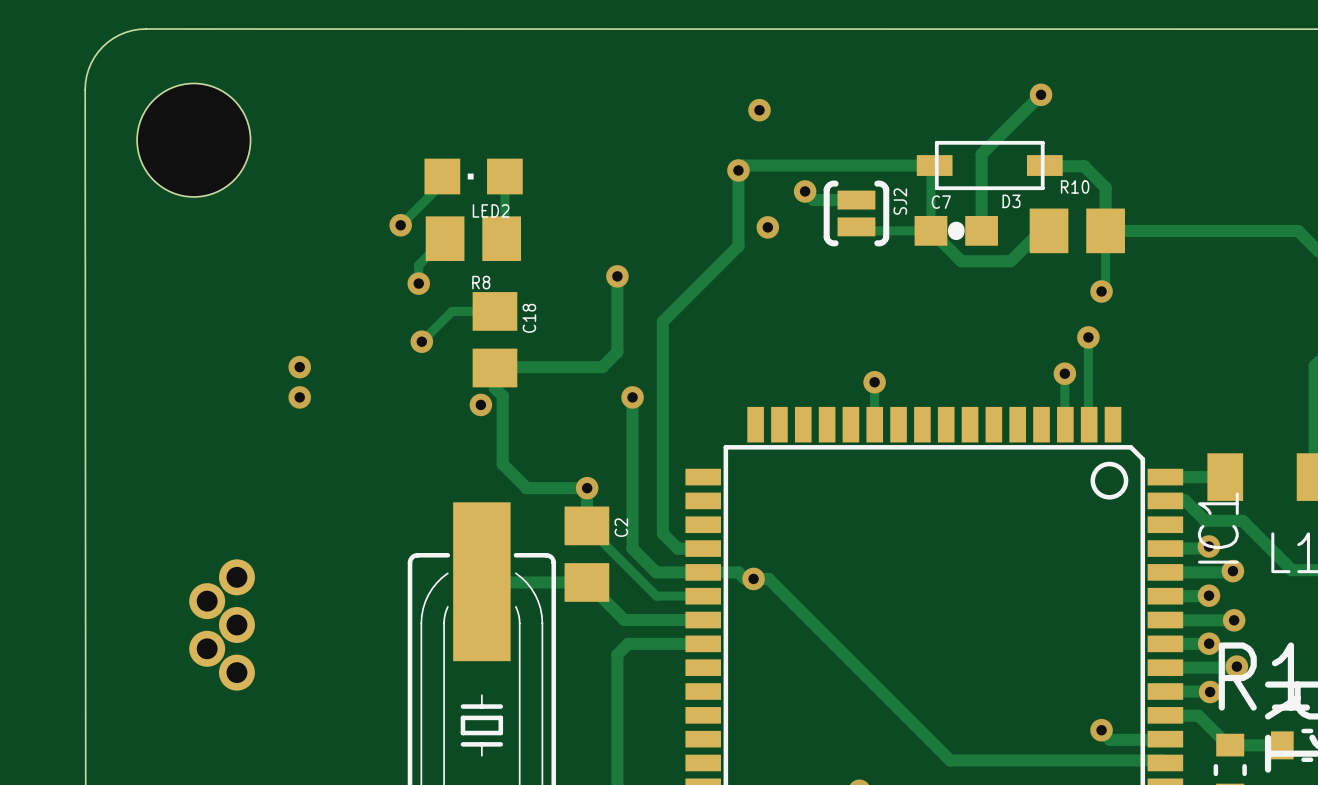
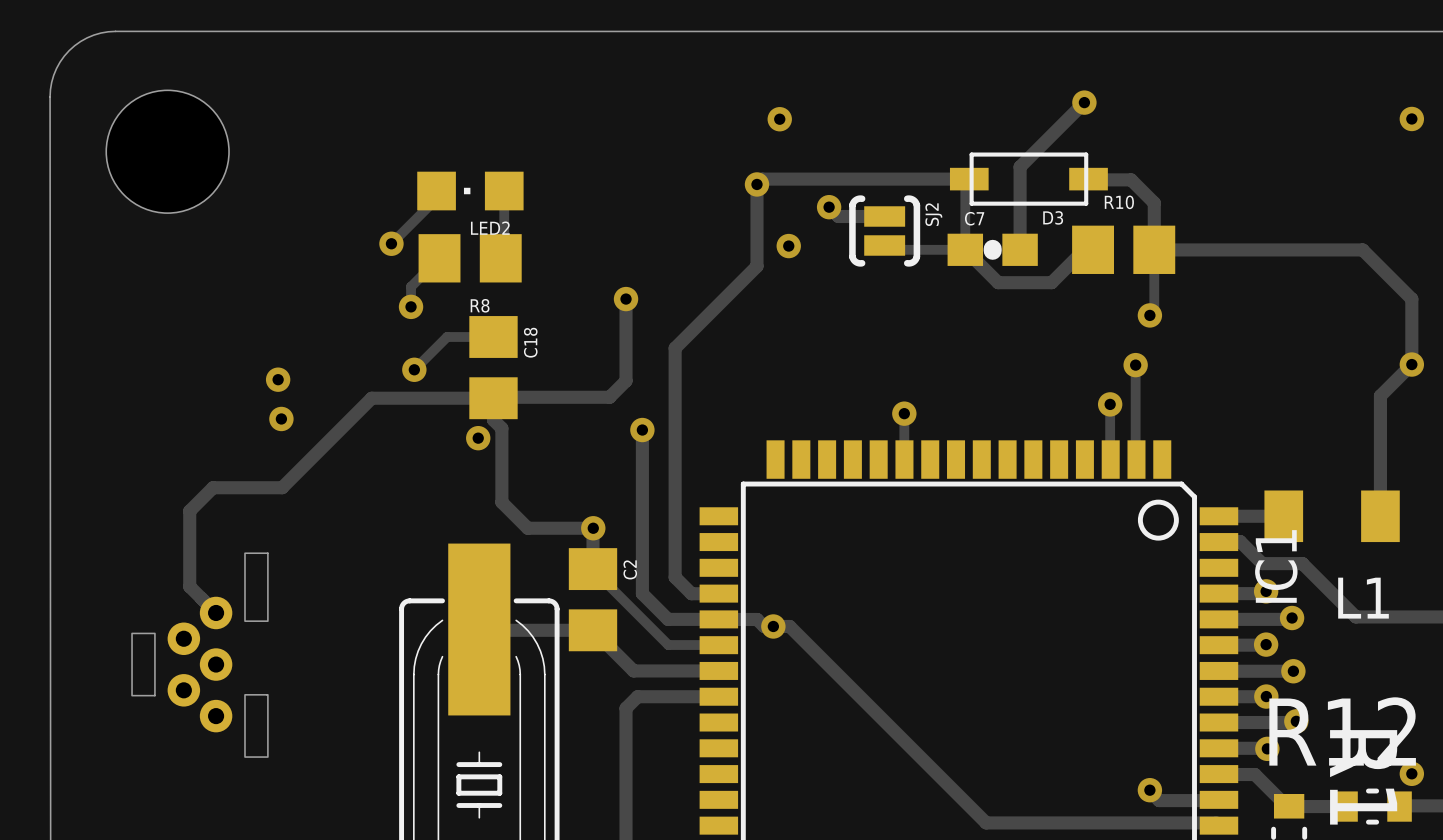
via: none -> (278, 379)
via: (299, 367) -> none
track: none -> (493, 398) (371, 398) (282, 487) (213, 487) (189, 511) (189, 586) (216, 612)
via: none -> (281, 418)
via: (299, 397) -> none
part footprint: [189, 559, 255, 691] -> [132, 552, 269, 758]

